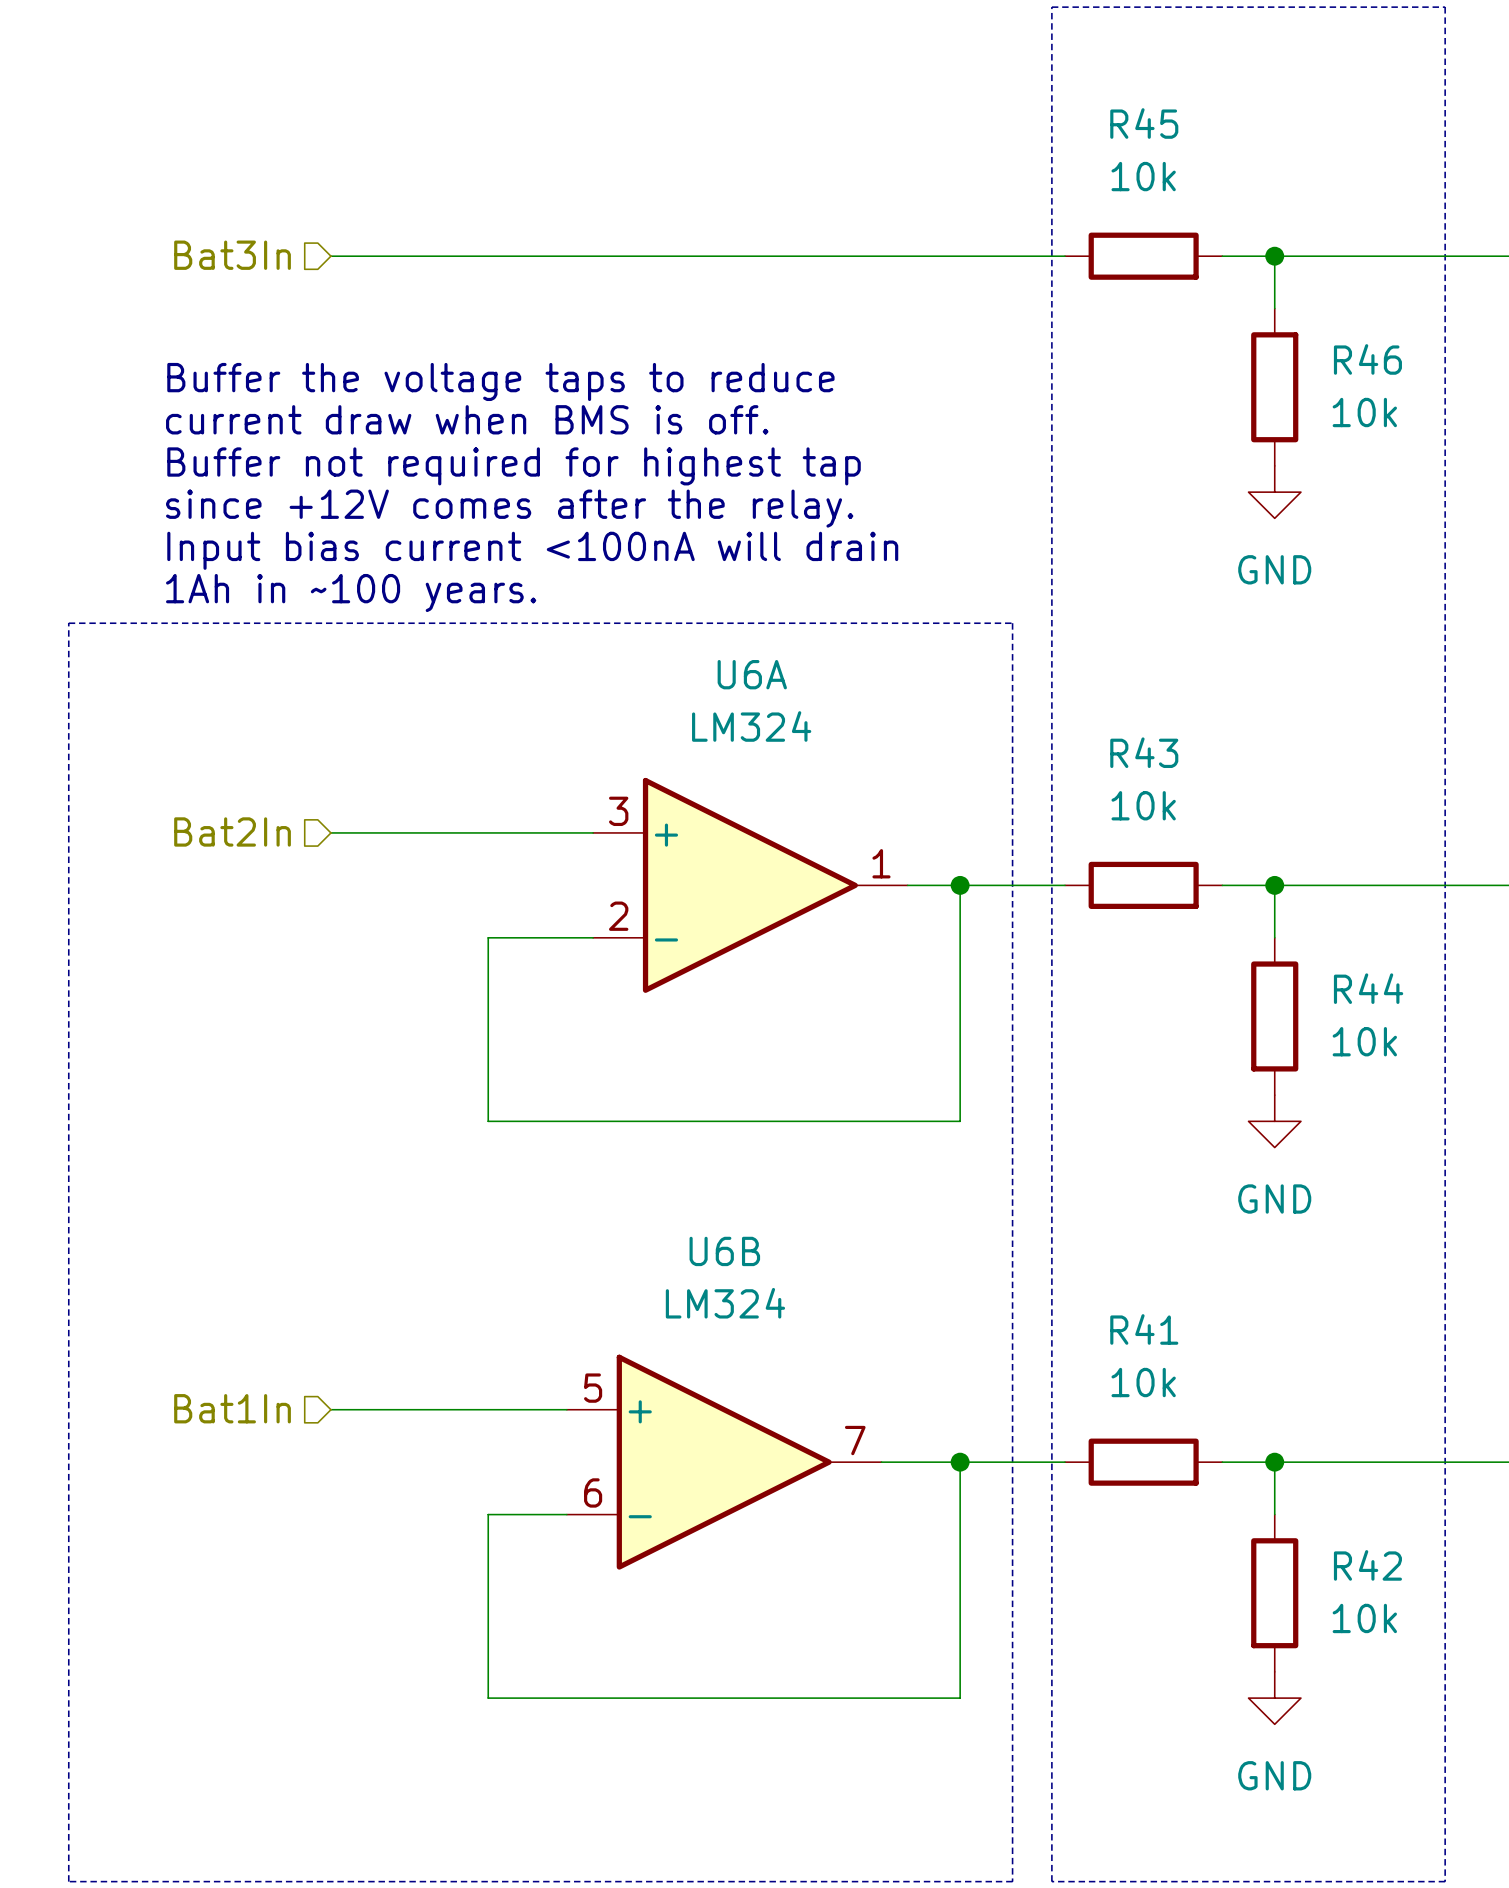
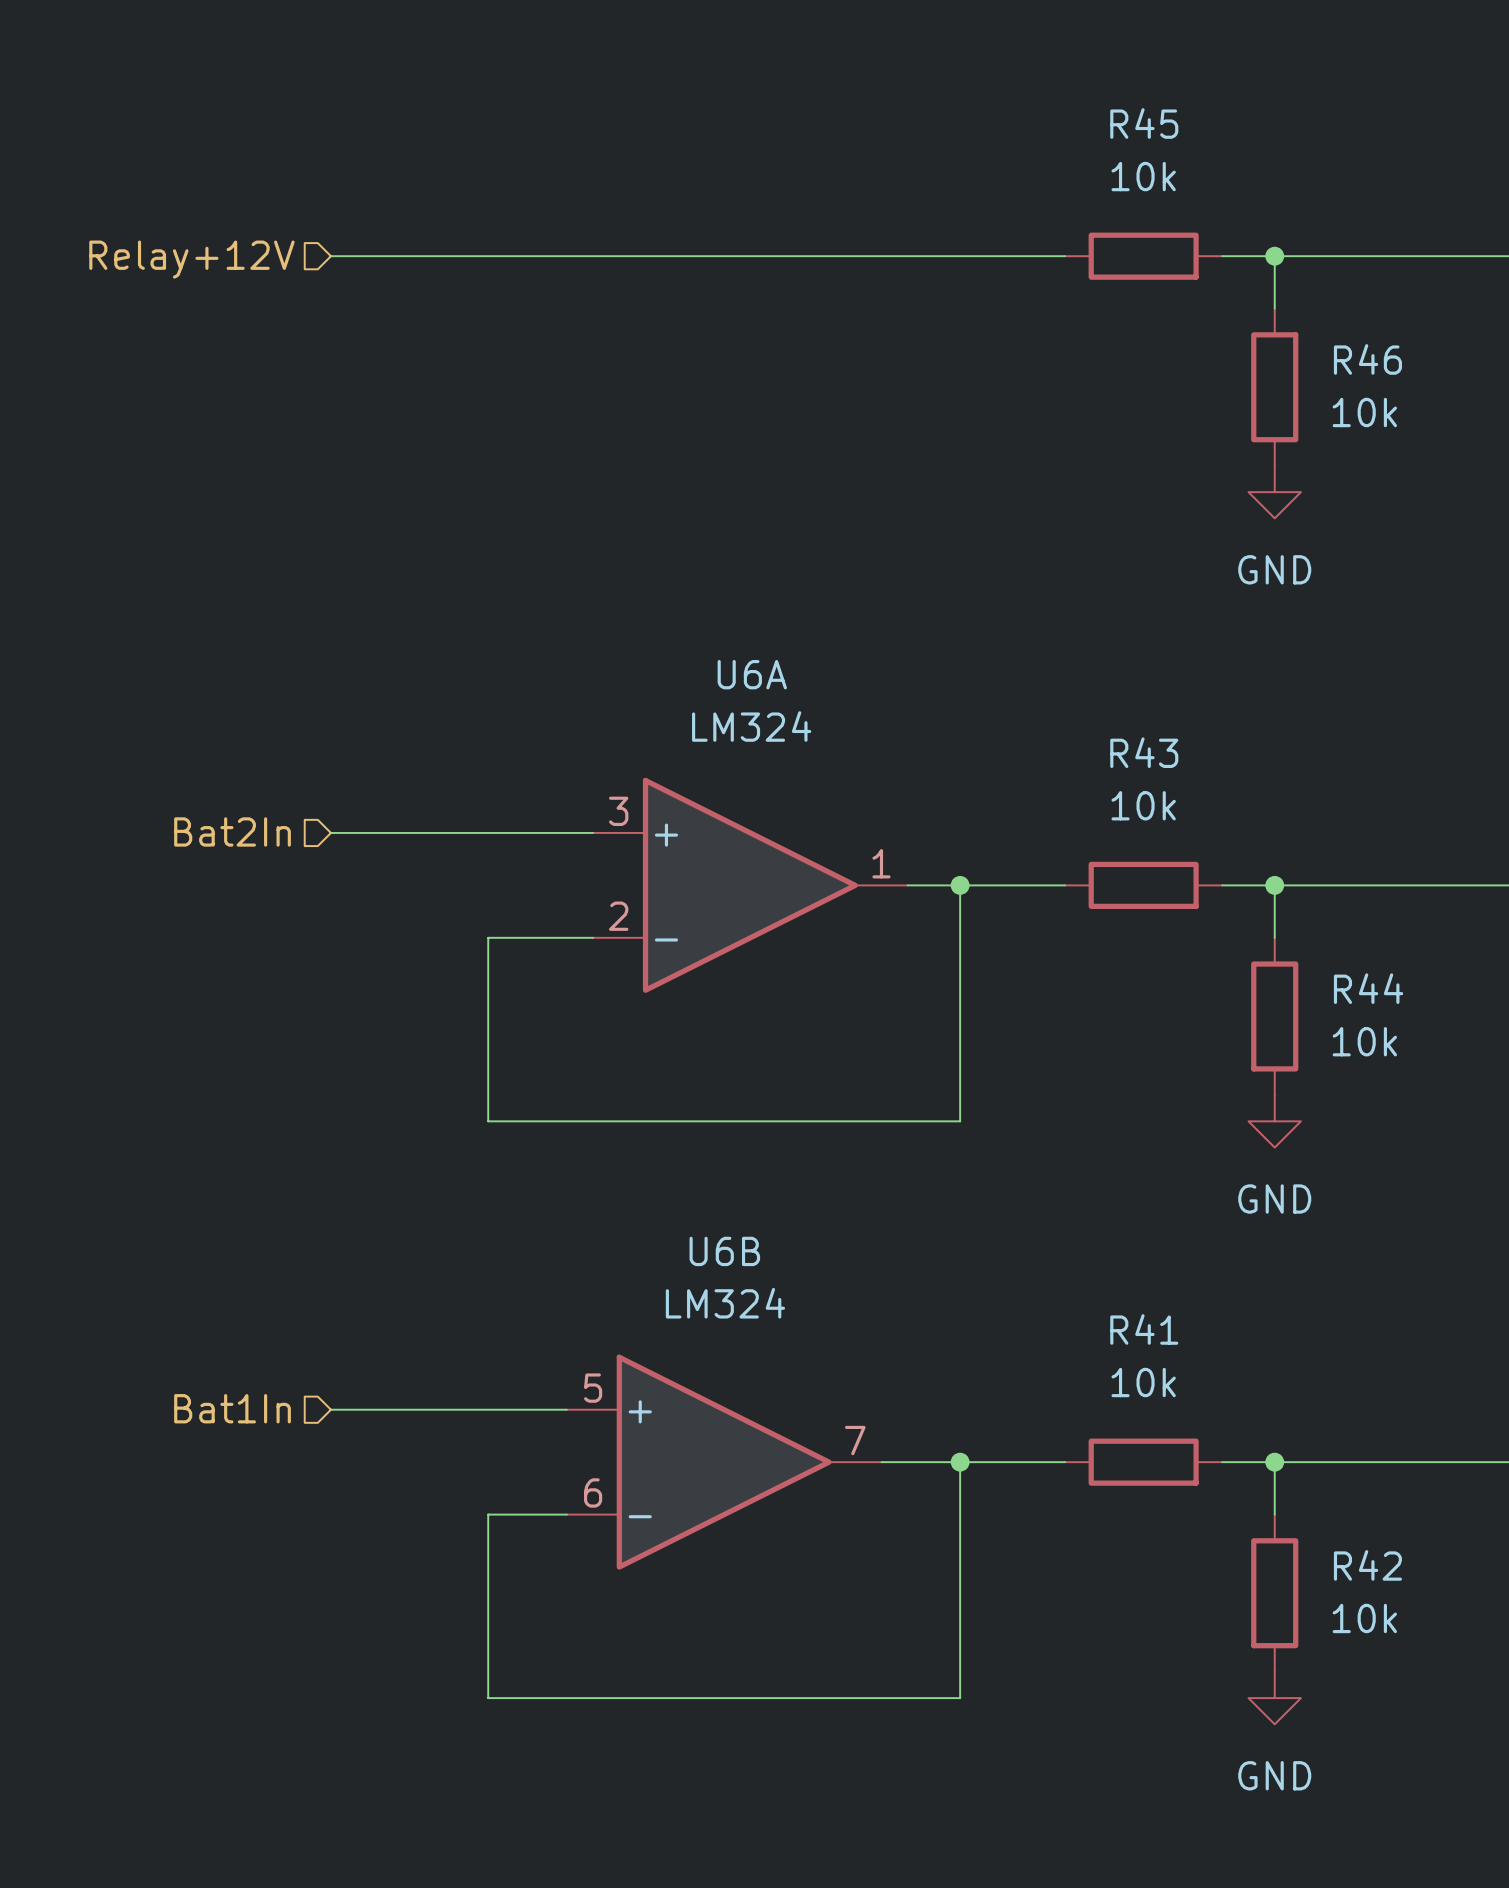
line: (1051, 7) (1445, 7) (1445, 1881) (1051, 1881) (1051, 7) -> none
hierarchical label: Bat3In (232, 255) -> Relay+12V (191, 259)
text: Buffer the voltage taps to reduce (500, 381) -> none
text: current draw when BMS is off. (467, 419) -> none
text: Buffer not required for highest tap (514, 466) -> none
text: since +12V comes after the relay. (509, 508) -> none
text: Input bias current <100nA will drain (532, 550) -> none
text: 1Ah in ~100 years. (351, 593) -> none
line: (68, 623) (1012, 623) (1012, 1881) (68, 1881) (68, 623) -> none

